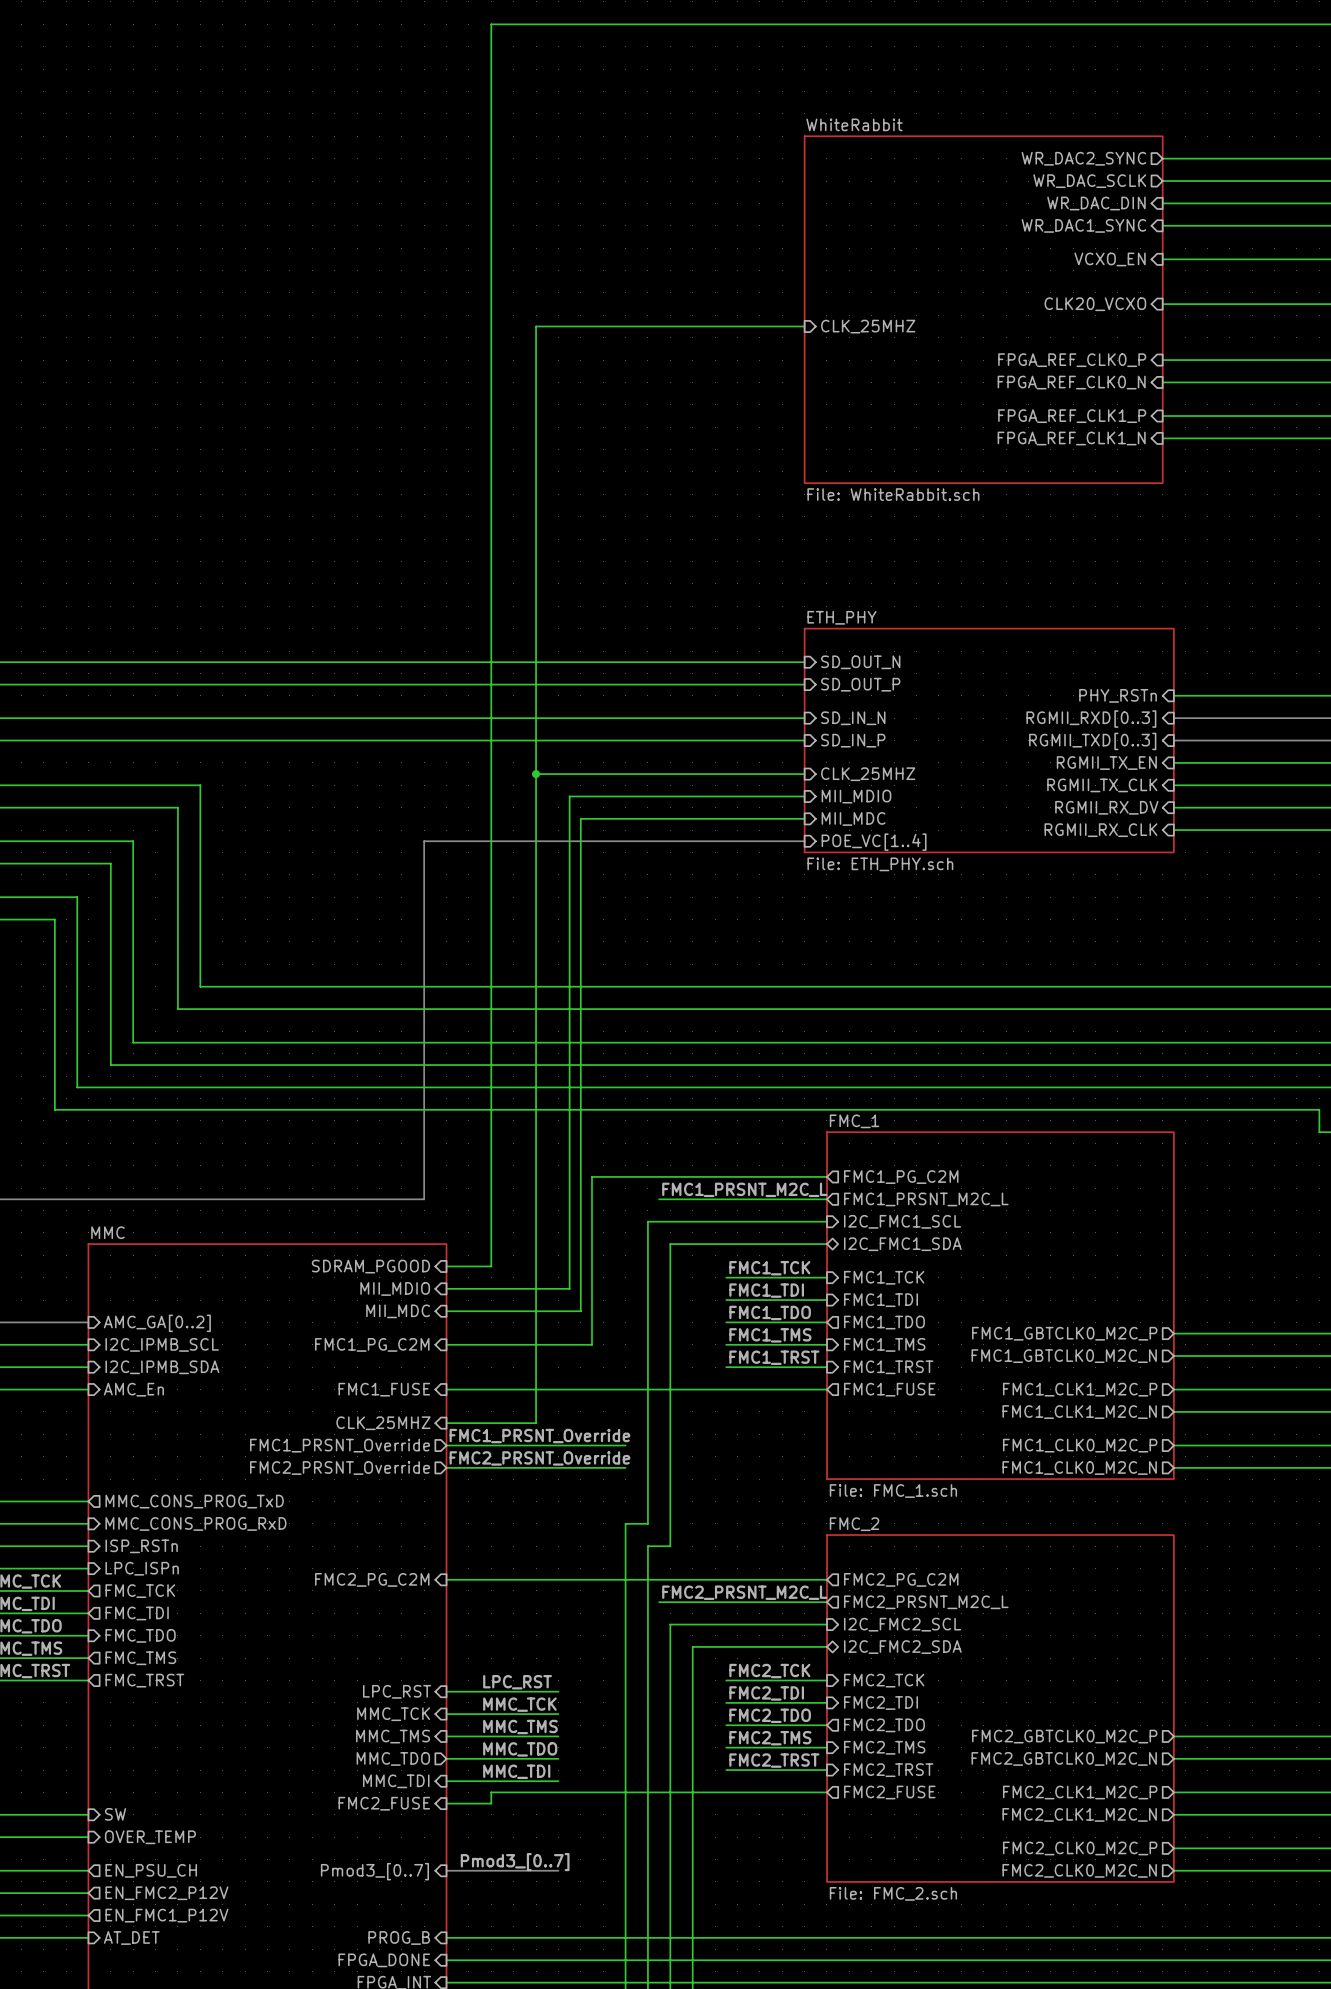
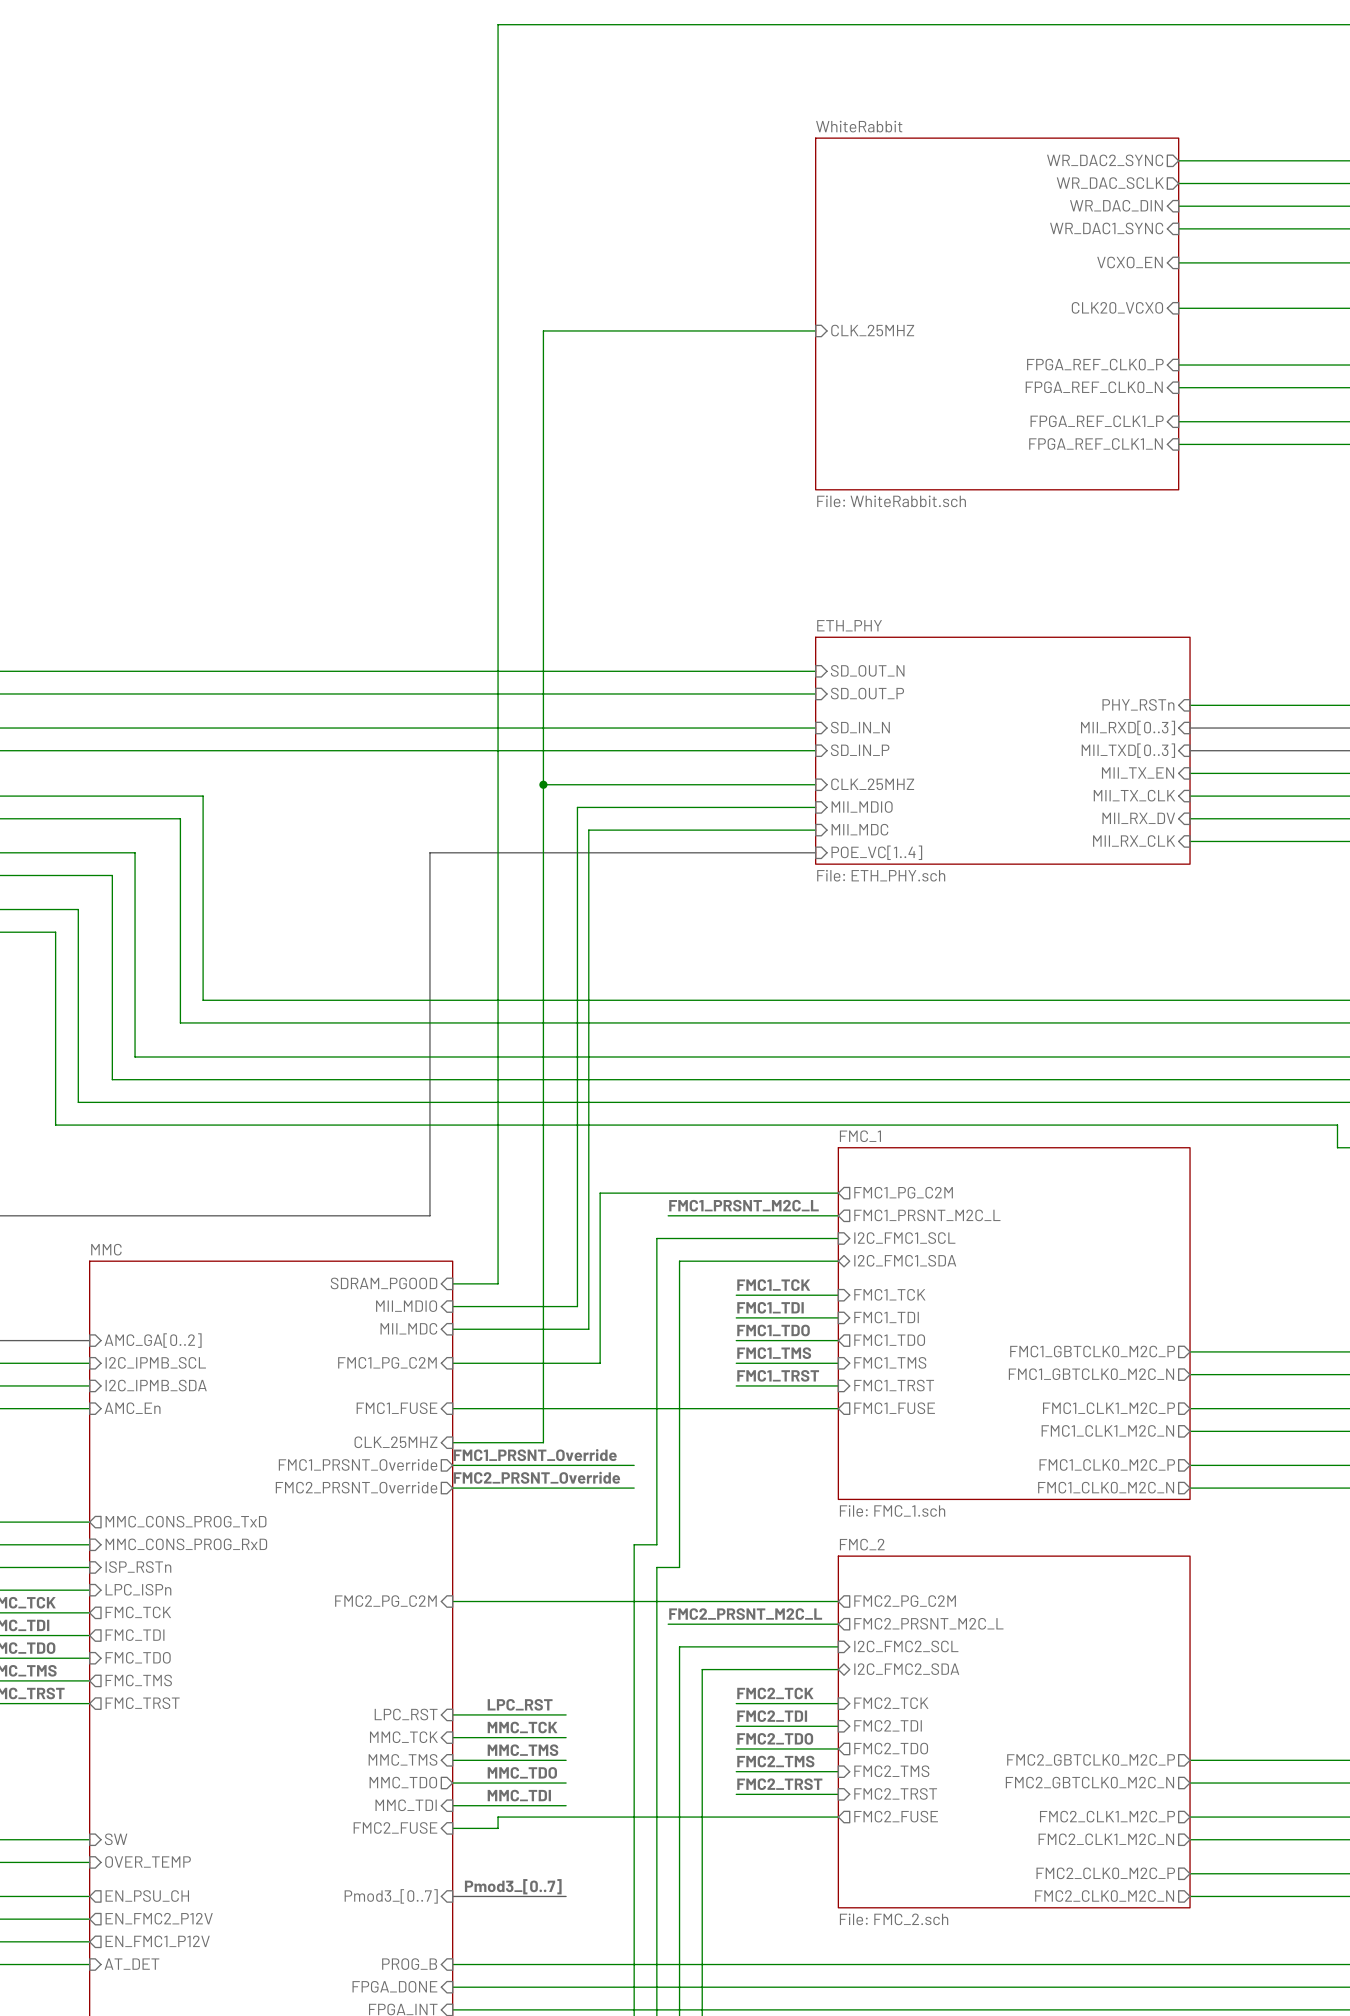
sheet pin: RGMII_RXD[0..3] (1091, 719) -> MII_RXD[0..3] (1128, 727)
sheet pin: RGMII_TXD[0..3] (1092, 741) -> MII_TXD[0..3] (1128, 750)
sheet pin: RGMII_TX_EN (1106, 763) -> MII_TX_EN (1138, 772)
sheet pin: RGMII_TX_CLK (1102, 785) -> MII_TX_CLK (1134, 795)
sheet pin: RGMII_RX_DV (1106, 807) -> MII_RX_DV (1138, 818)
sheet pin: RGMII_RX_CLK (1100, 830) -> MII_RX_CLK (1134, 841)

